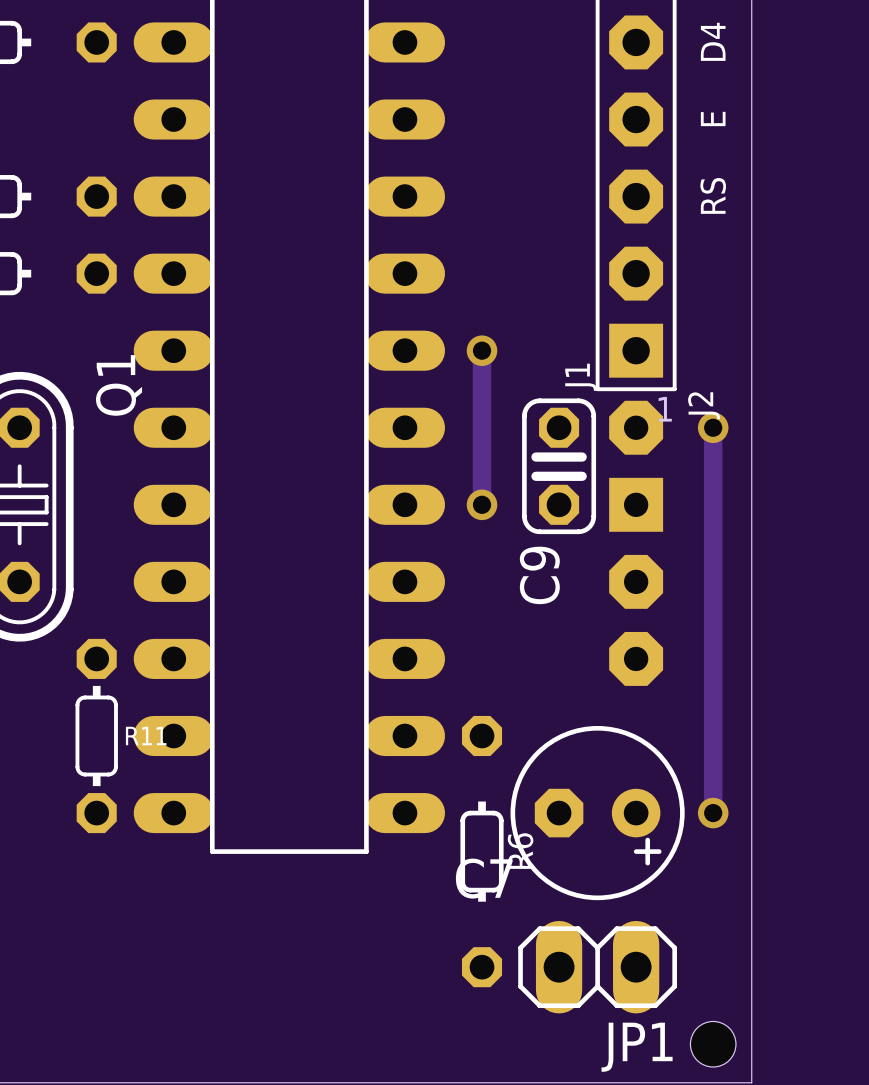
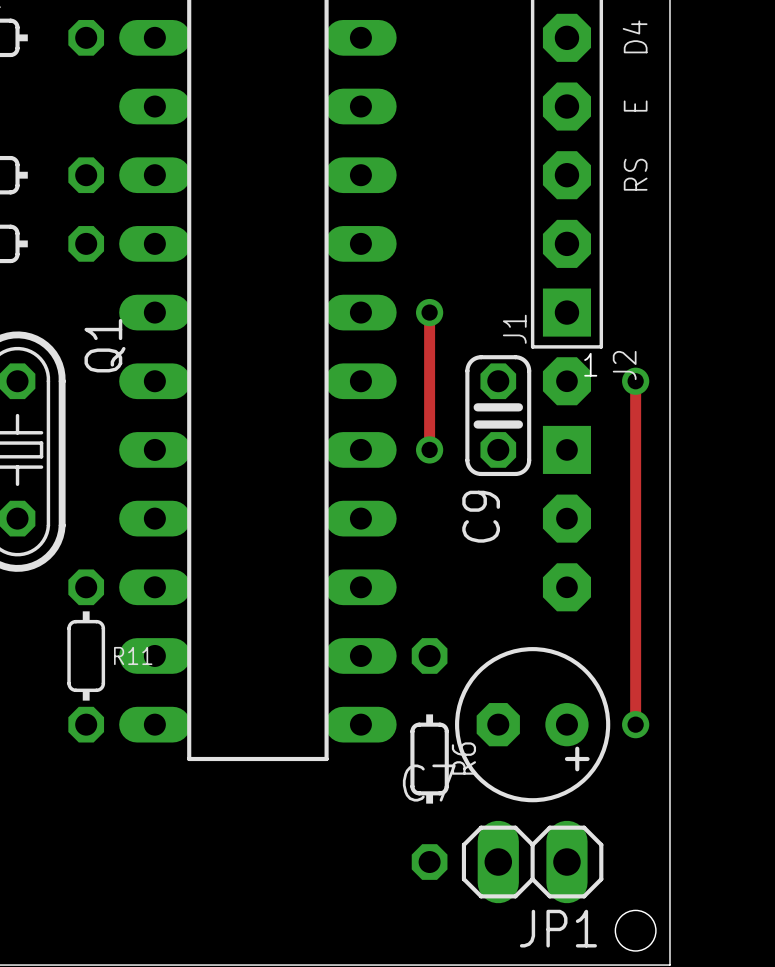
track width: thick (482, 350) (482, 504) -> thin (429, 312) (429, 449)
track width: thick (713, 427) (713, 813) -> thin (635, 381) (635, 724)

